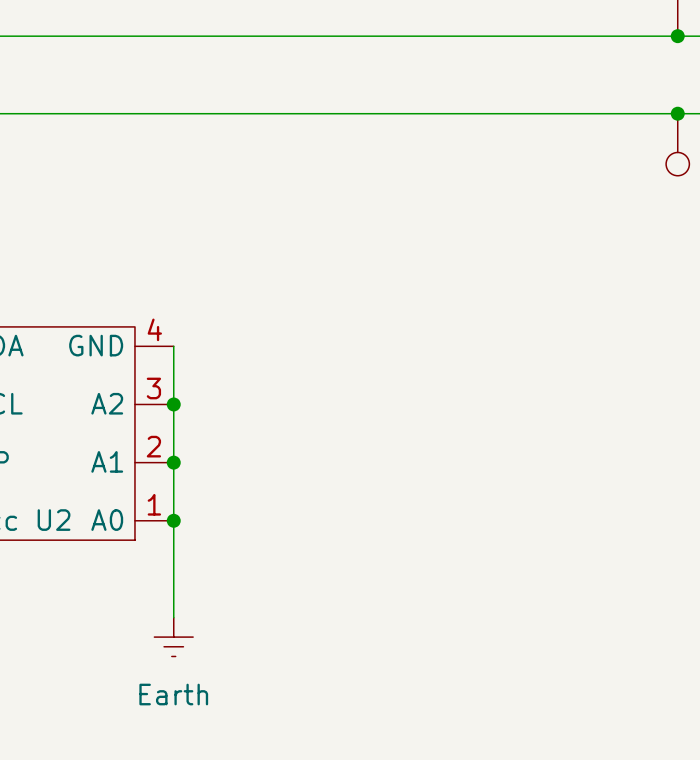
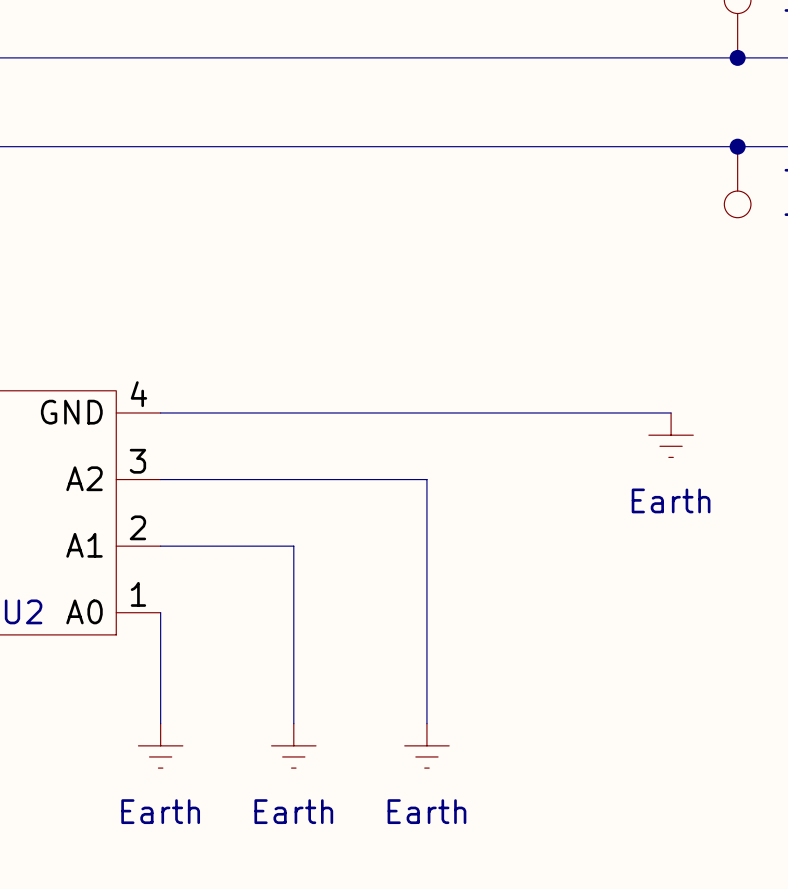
wire: (173, 346) (173, 520) -> (160, 412) (671, 412)
power symbol: none -> Earth (671, 435)
wire: none -> (160, 479) (426, 479) (426, 723)
junction: (173, 404) -> none
wire: none -> (160, 546) (293, 546) (293, 723)
junction: (173, 462) -> none
junction: (173, 520) -> none
power symbol: none -> Earth (293, 745)
power symbol: none -> Earth (426, 745)

